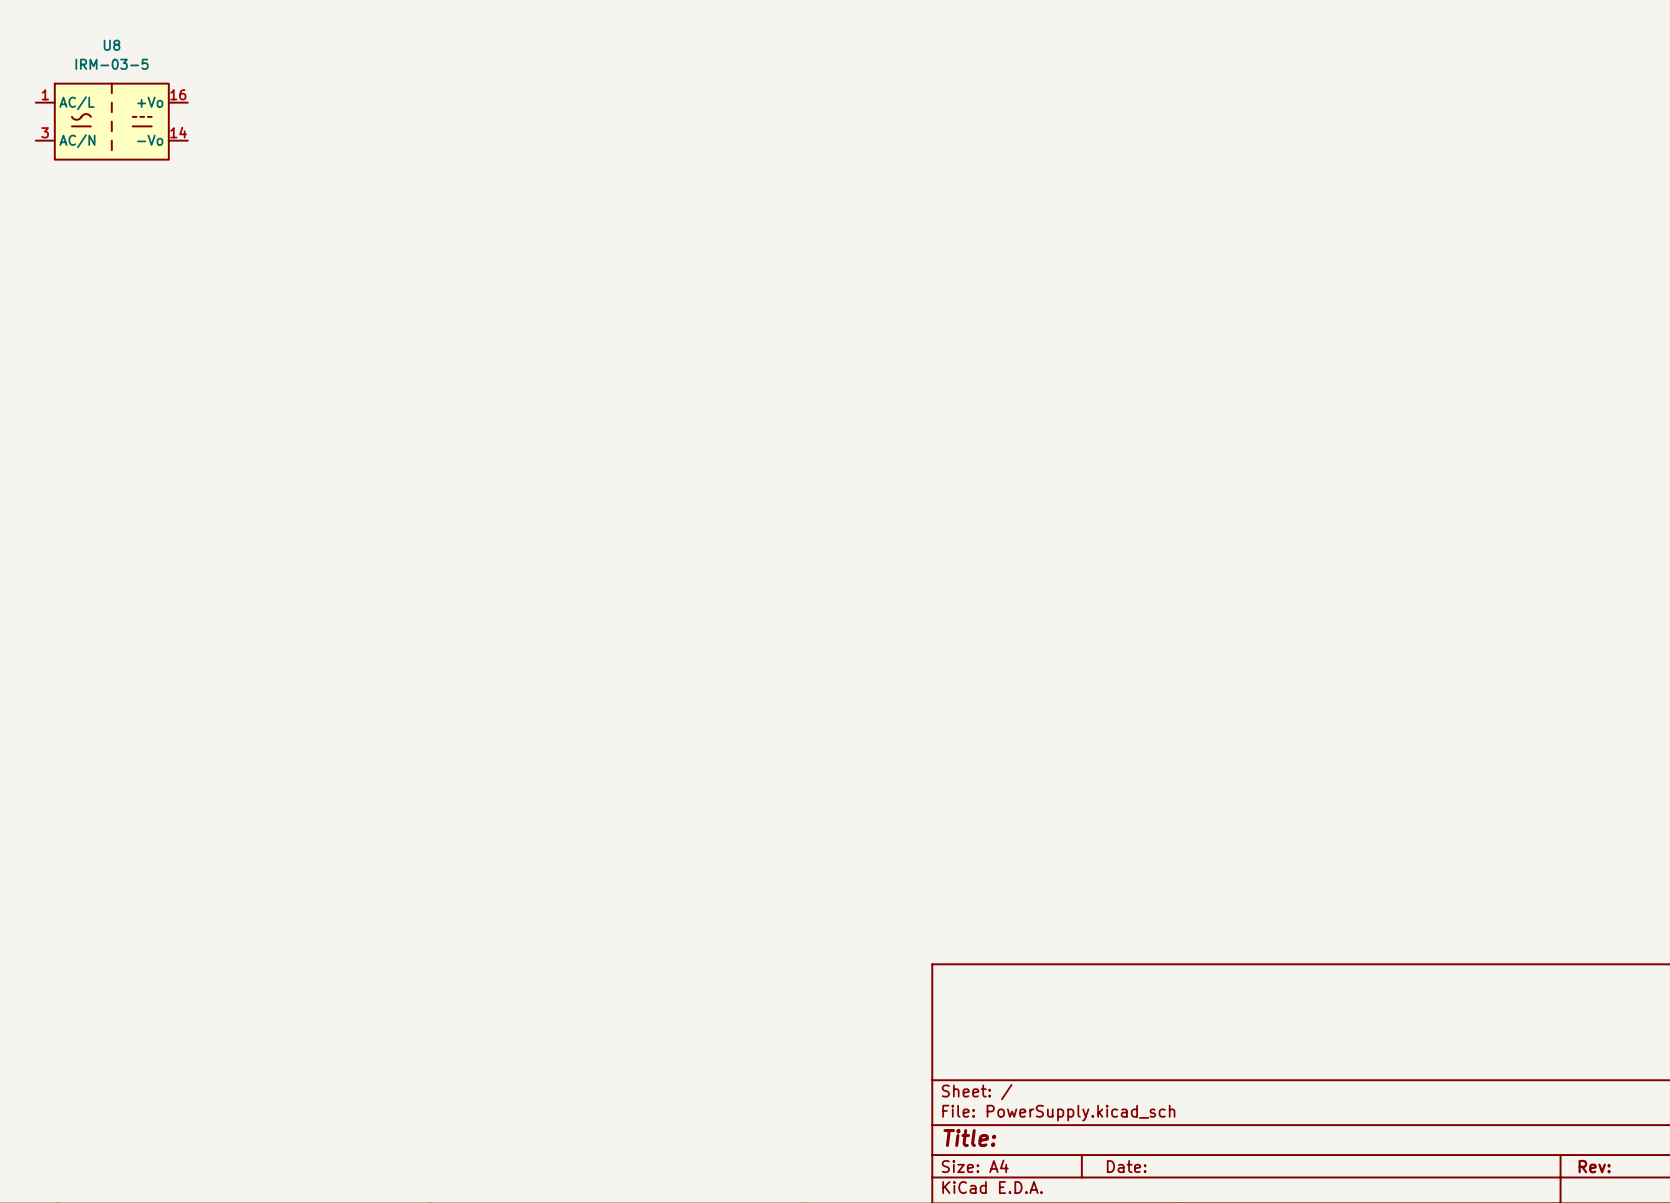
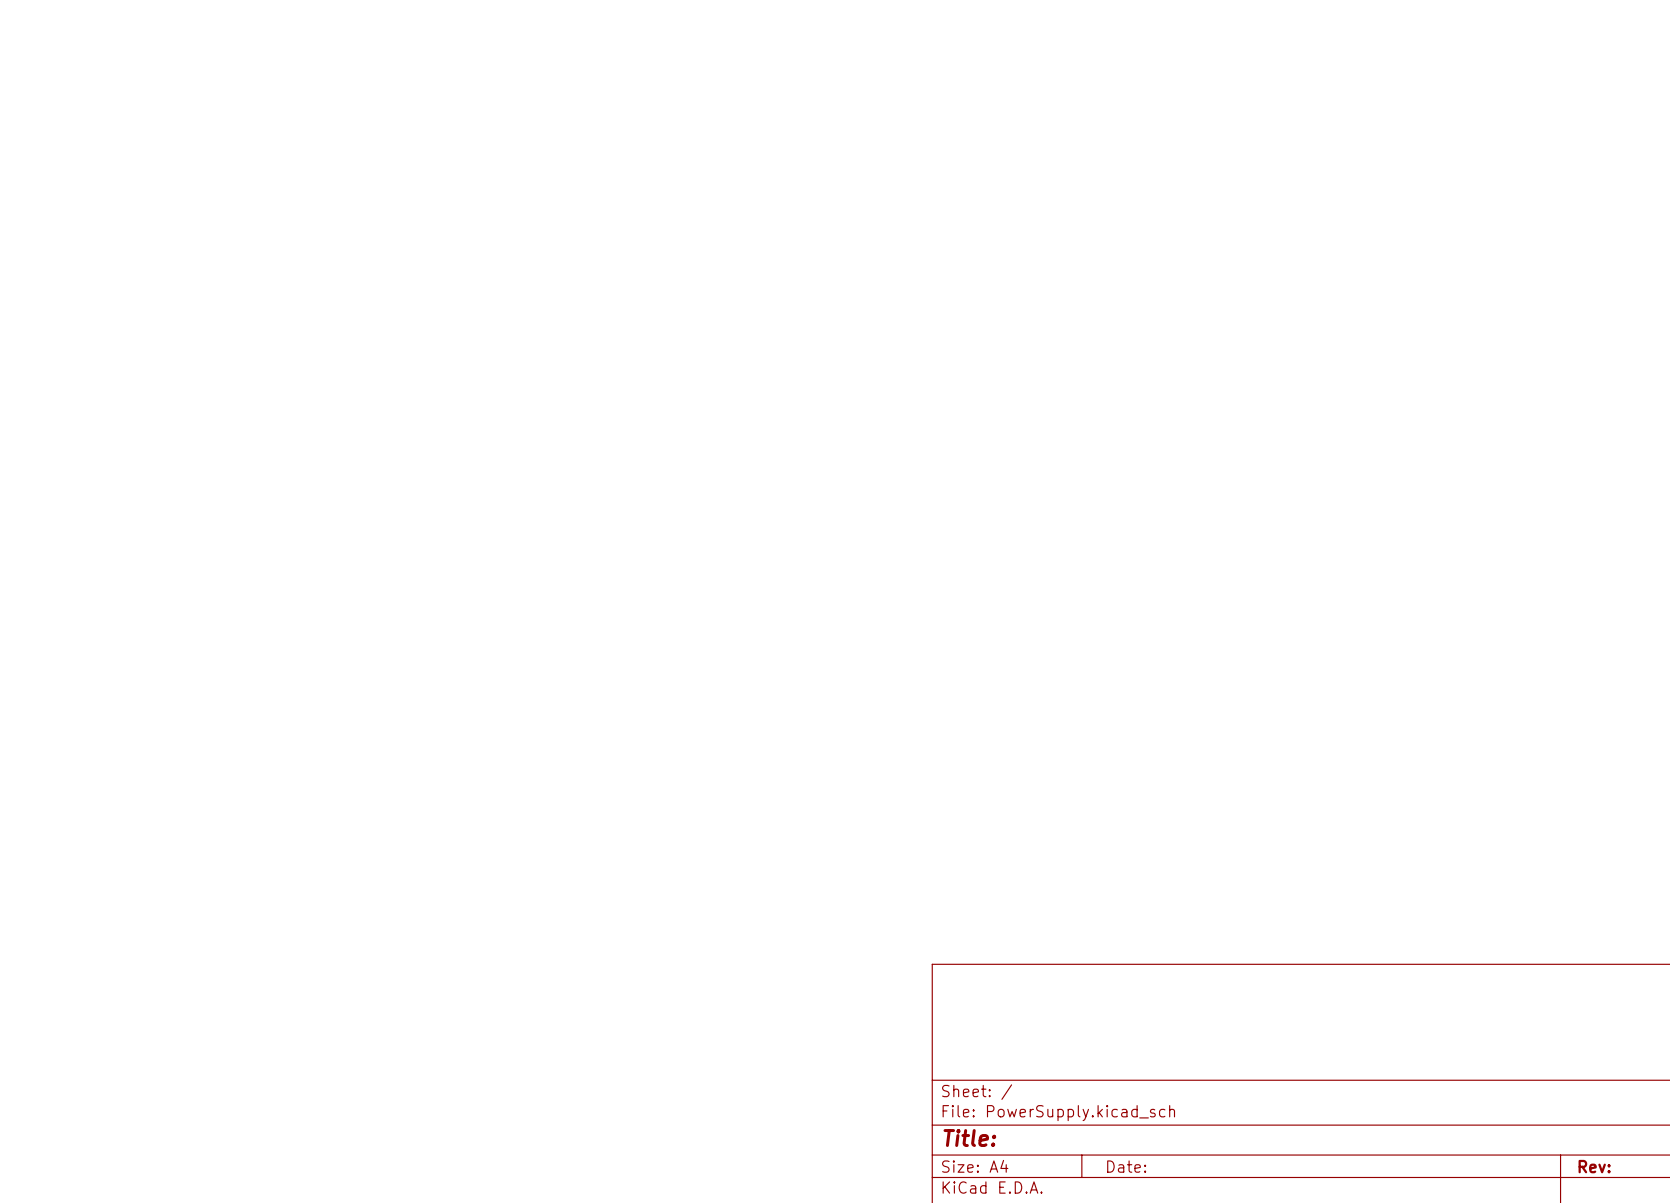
U8: IRM-03-5 (111, 121) -> none

